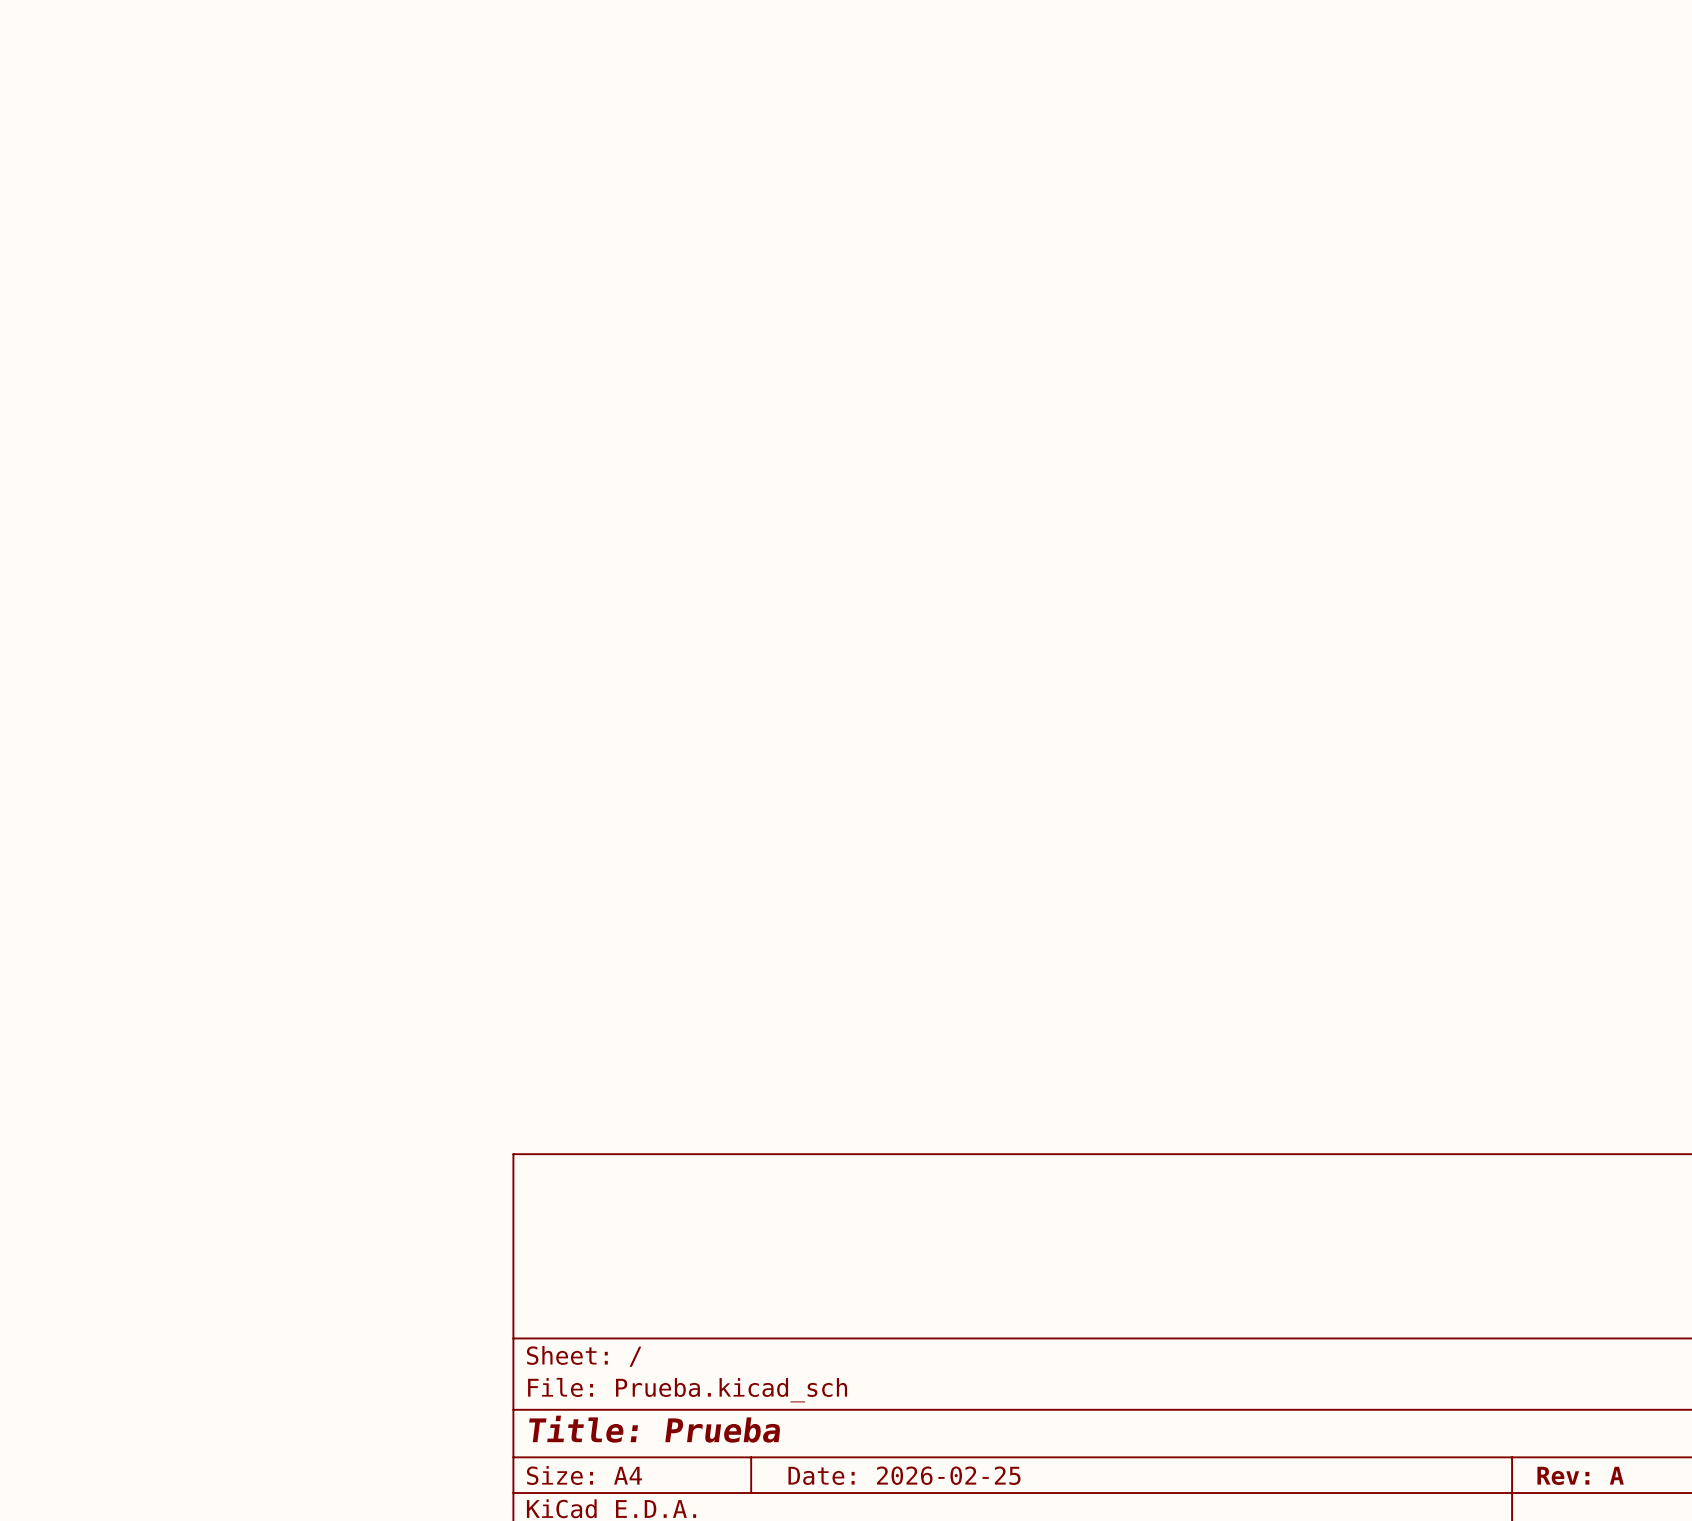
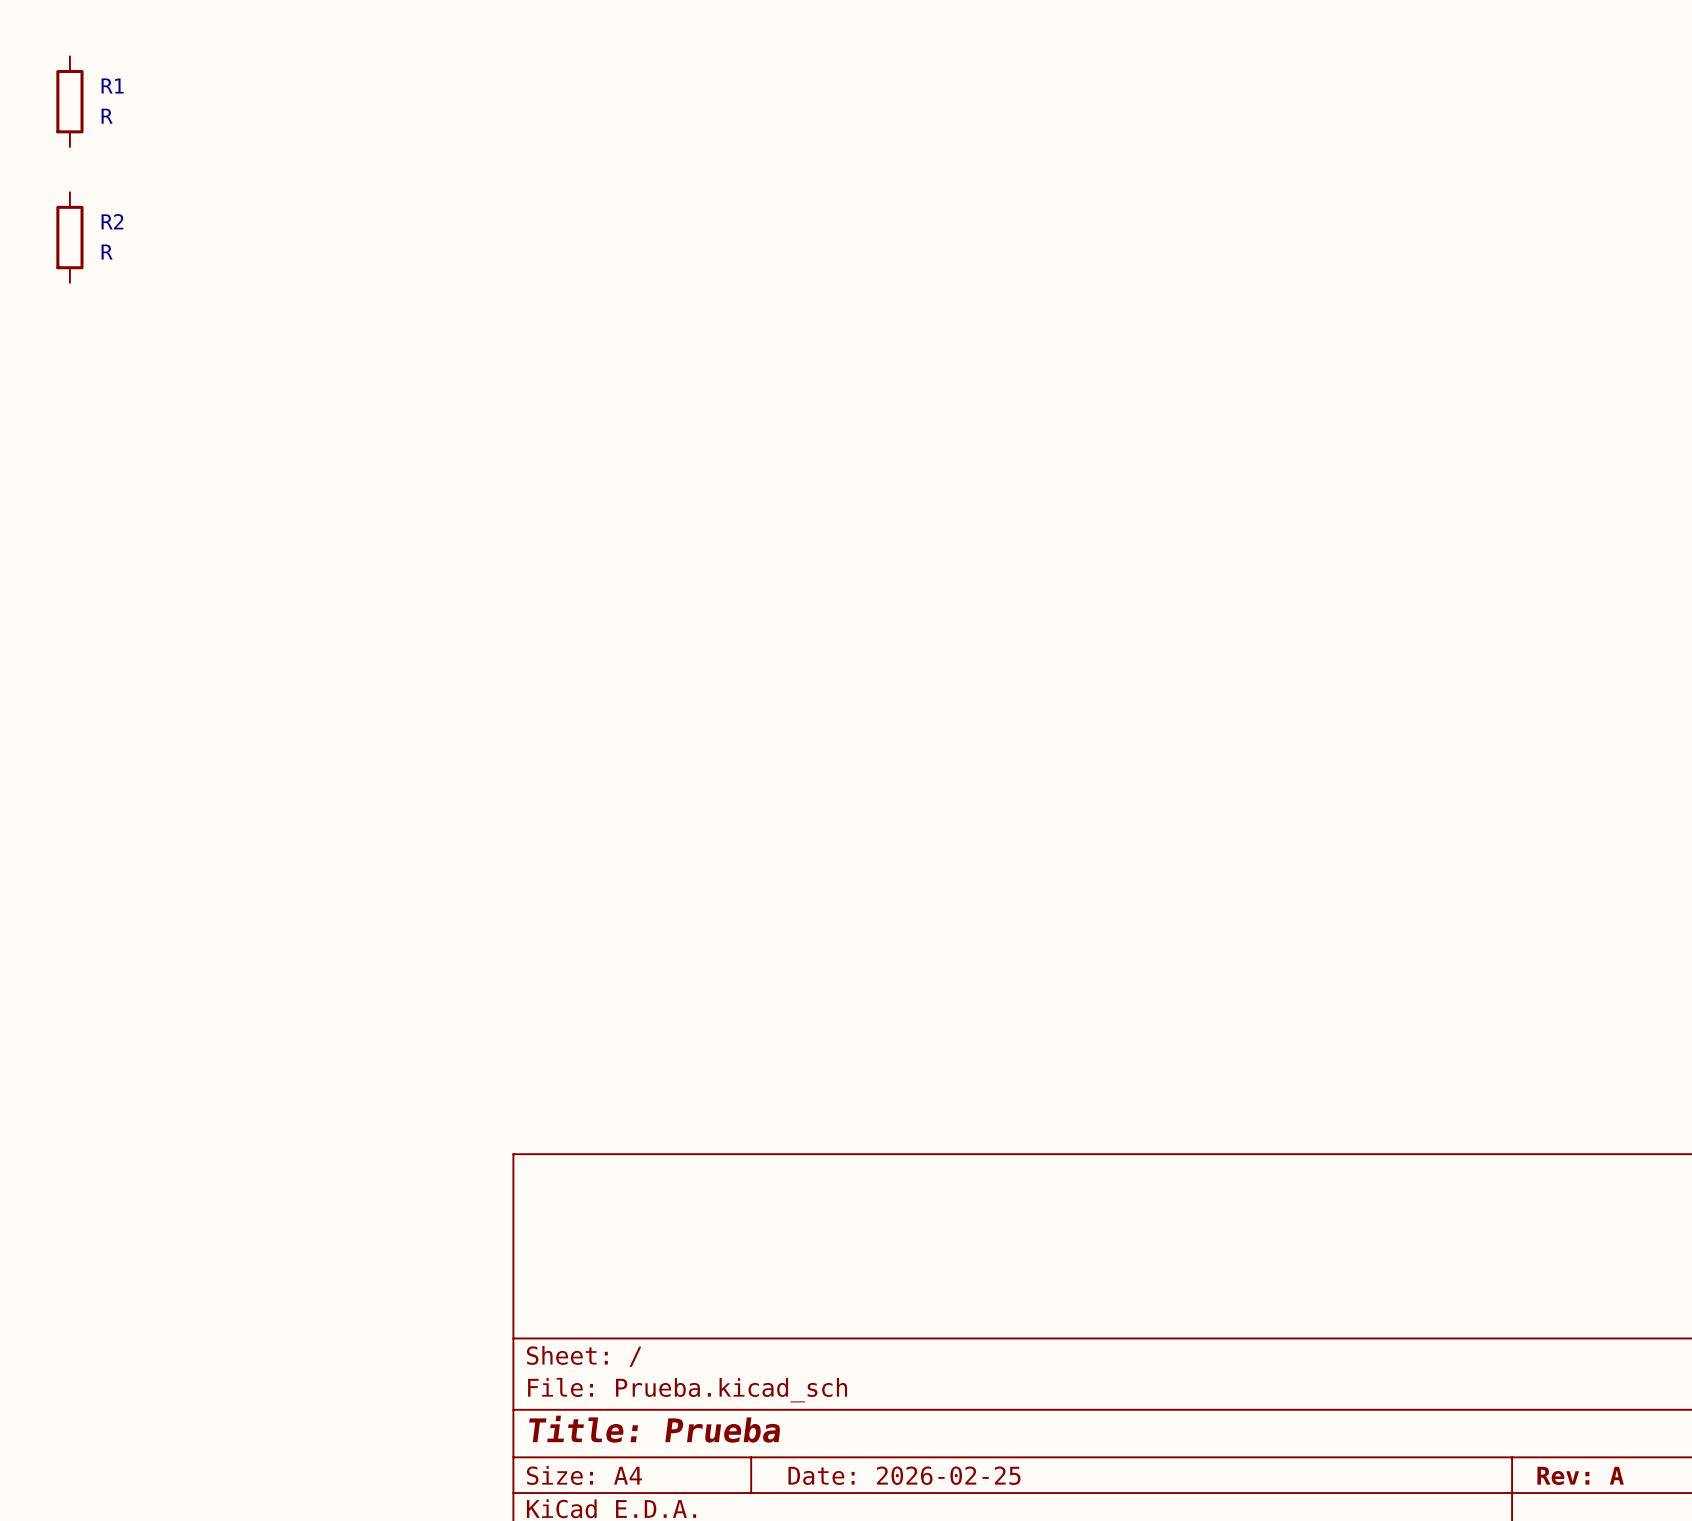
R1: none -> R (69, 101)
R2: none -> R (69, 237)

